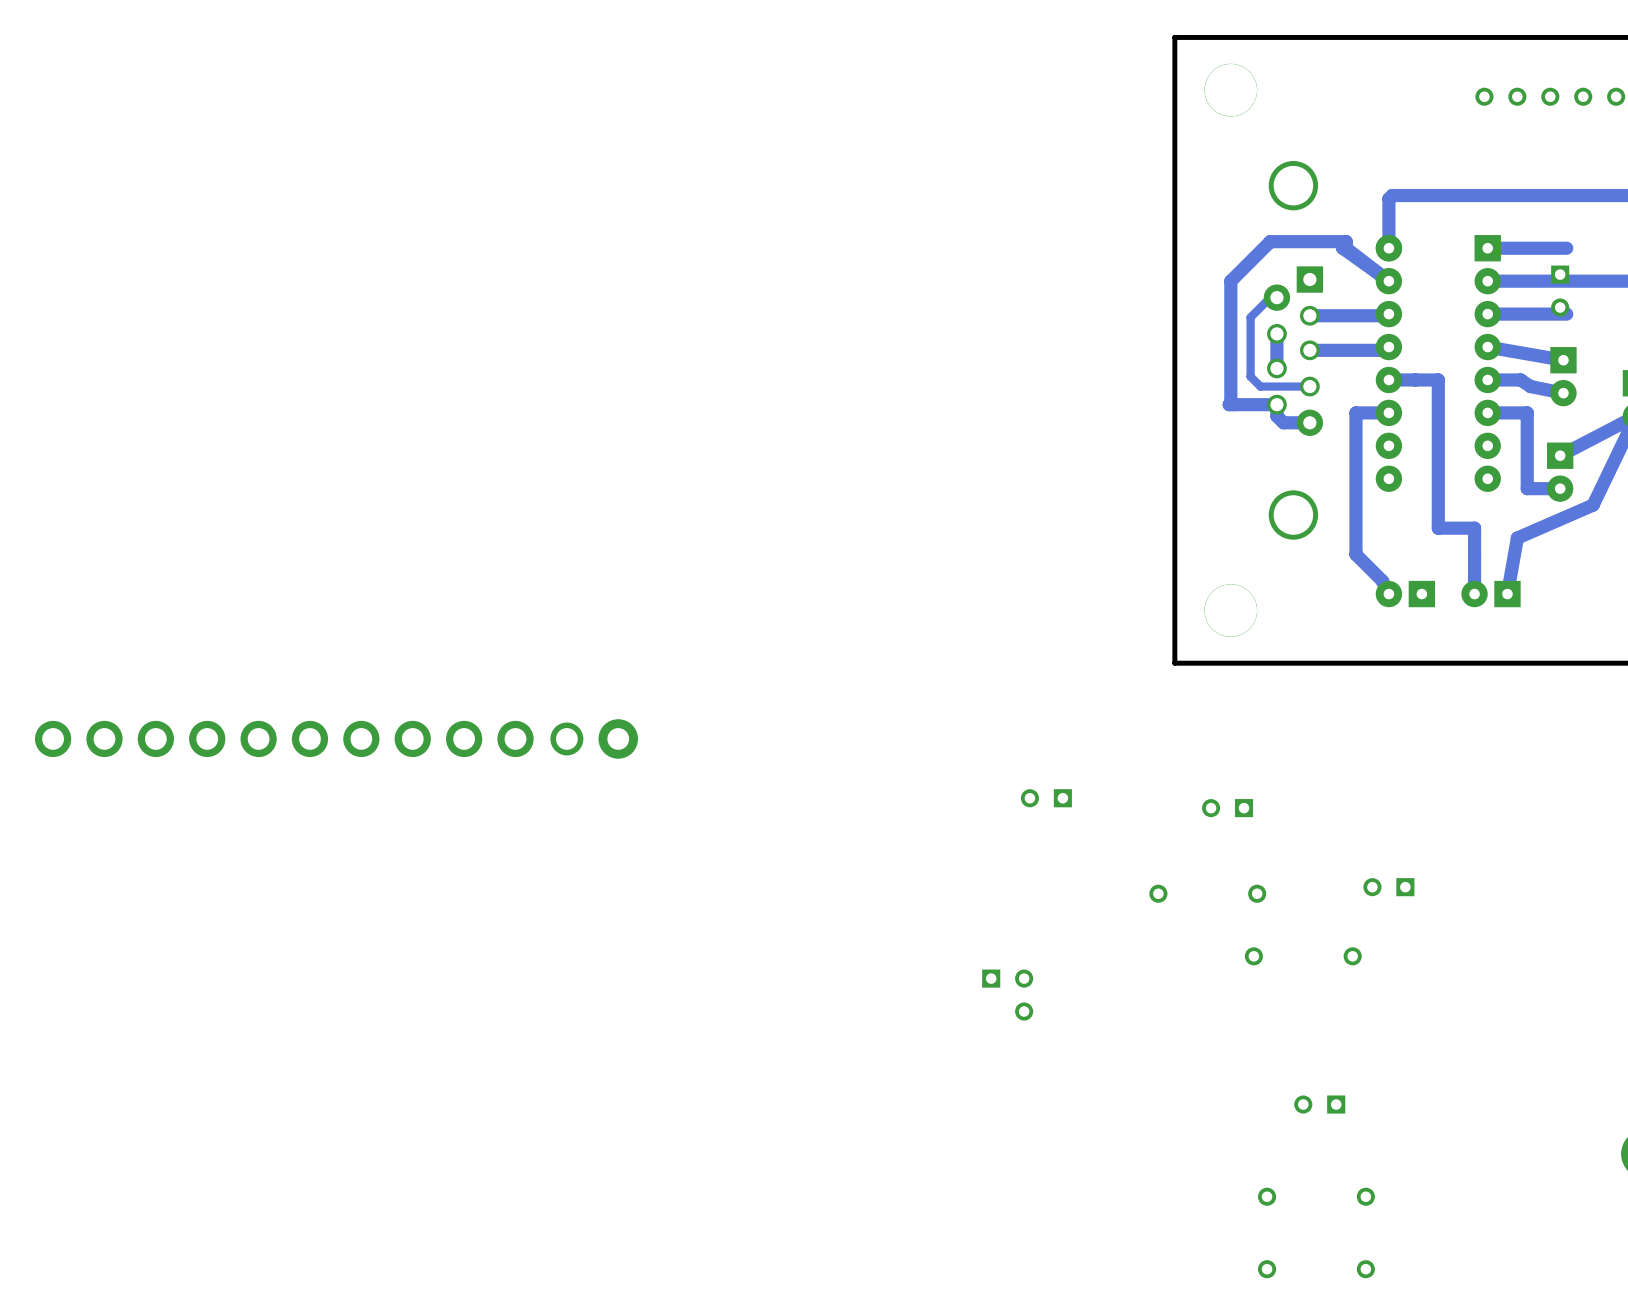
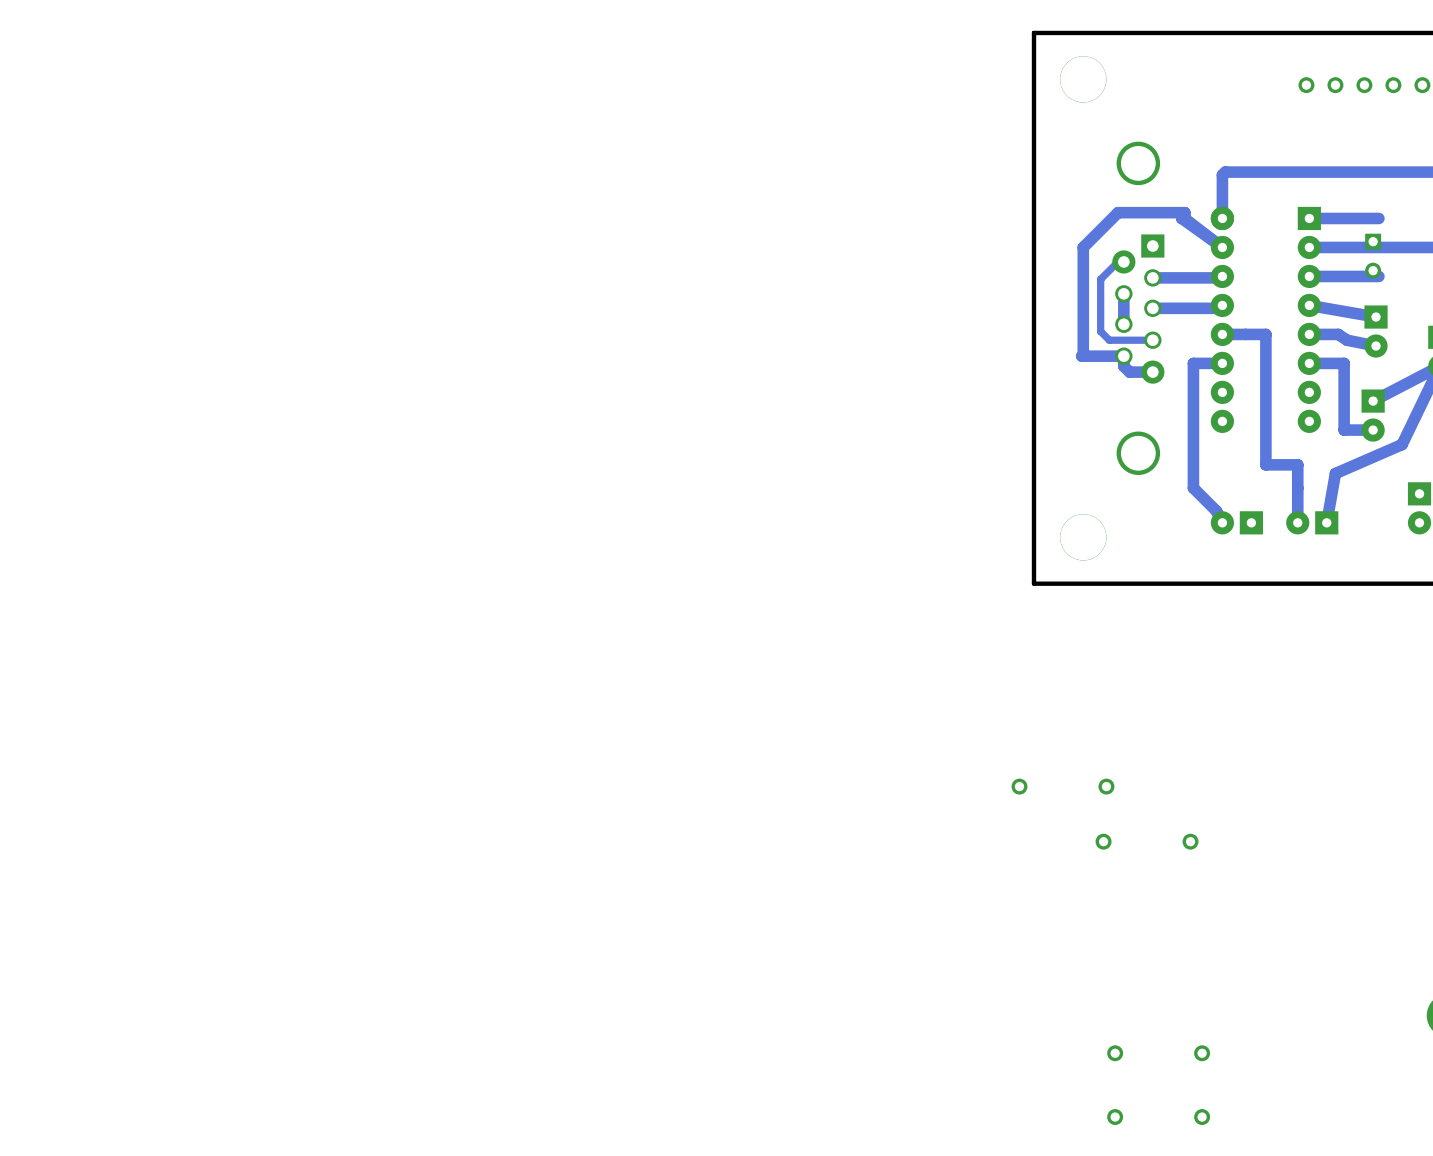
part: none -> (1419, 508)
part: (336, 738) -> none
part: (1046, 798) -> none
part: (1227, 808) -> none
part: (1388, 887) -> none
part: (1007, 995) -> none
part: (1319, 1104) -> none

